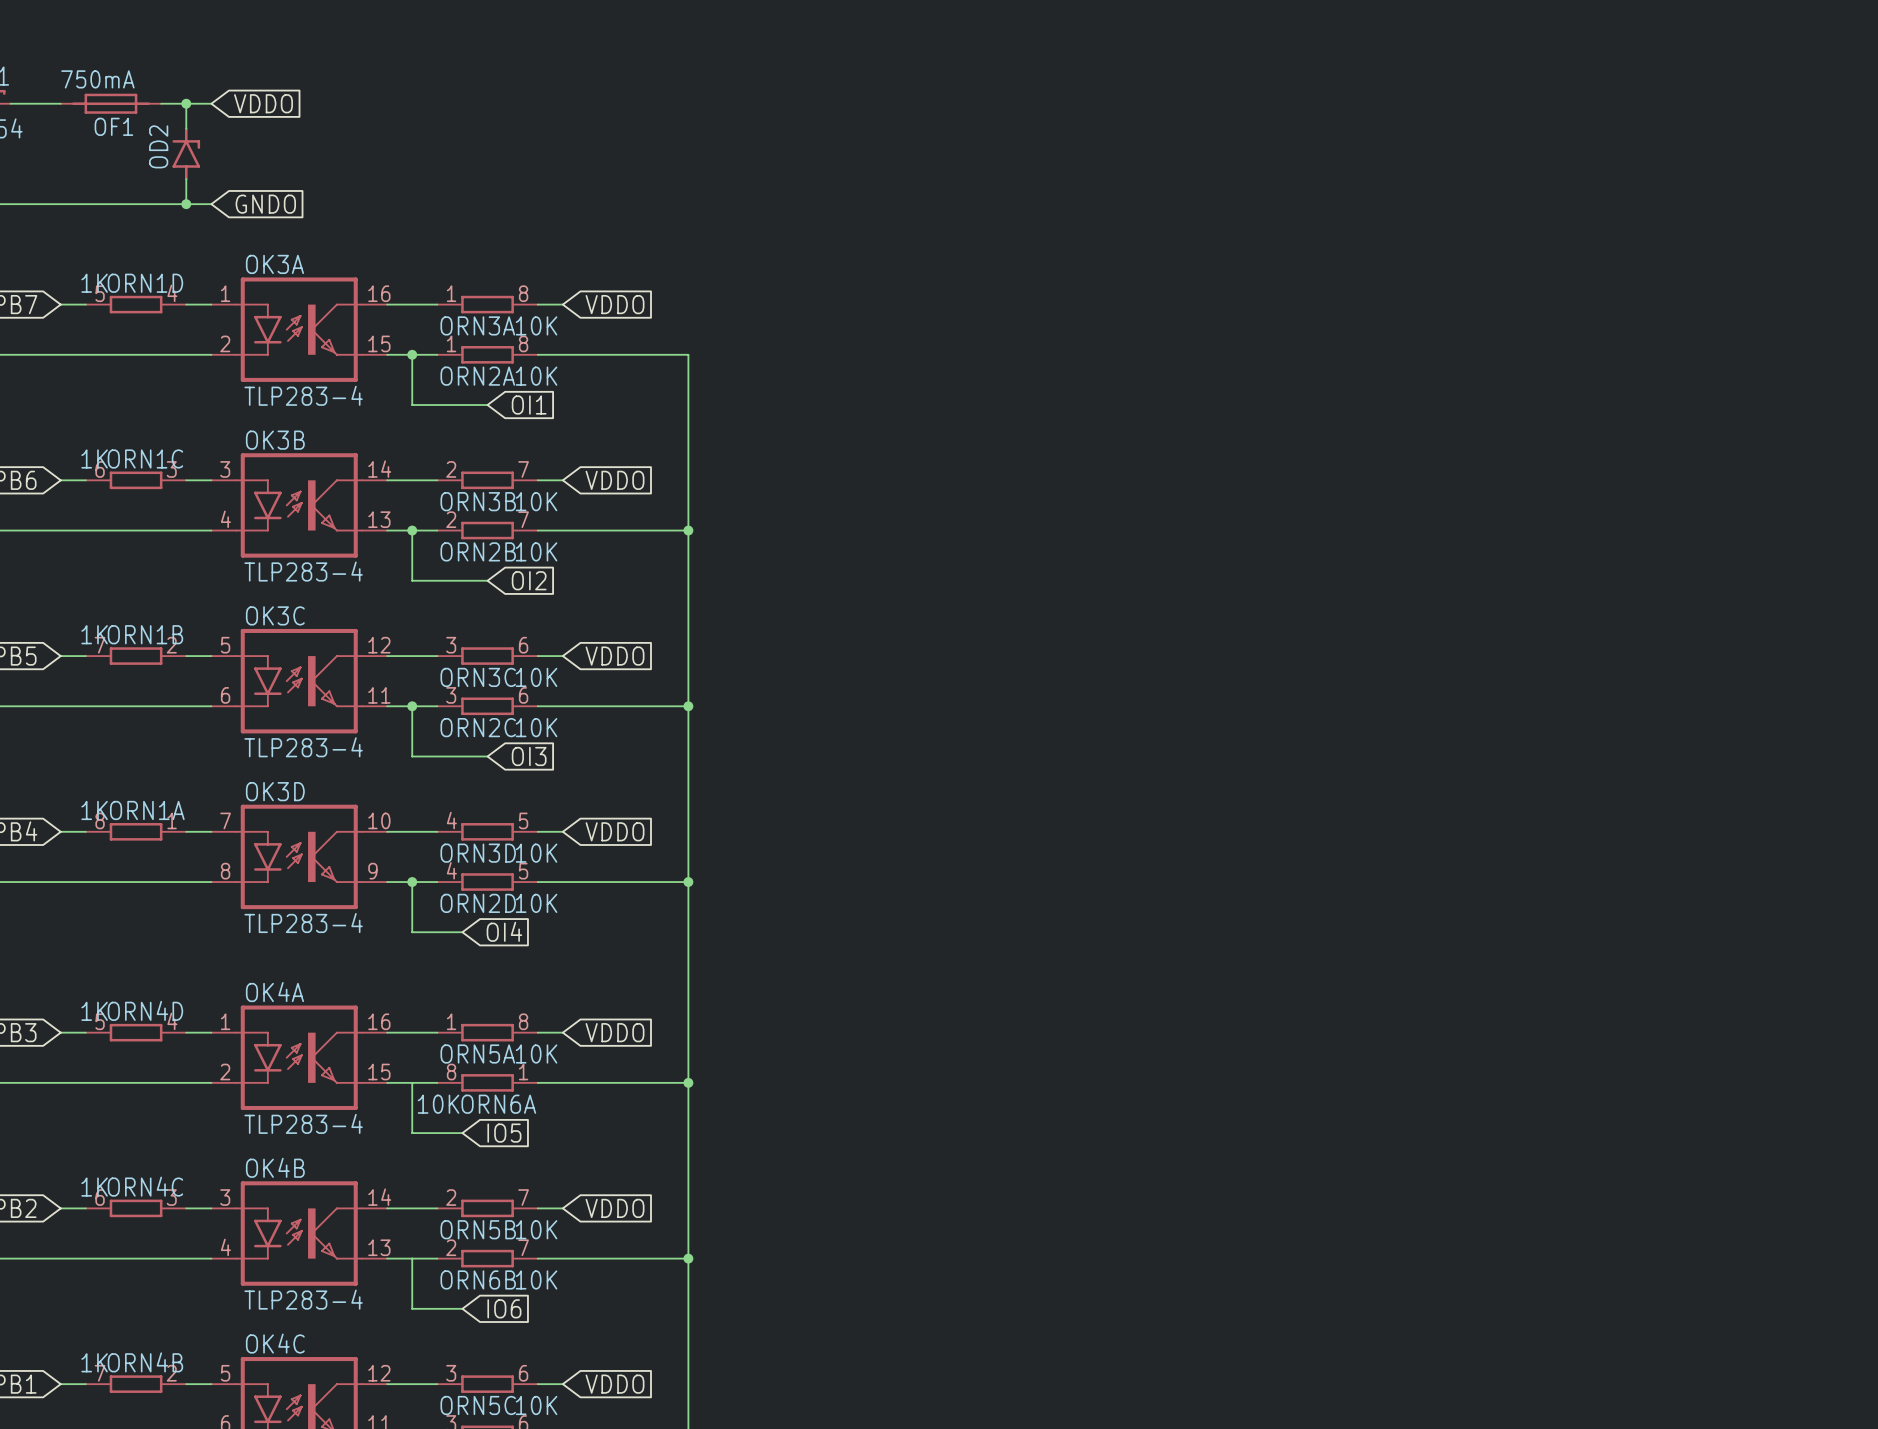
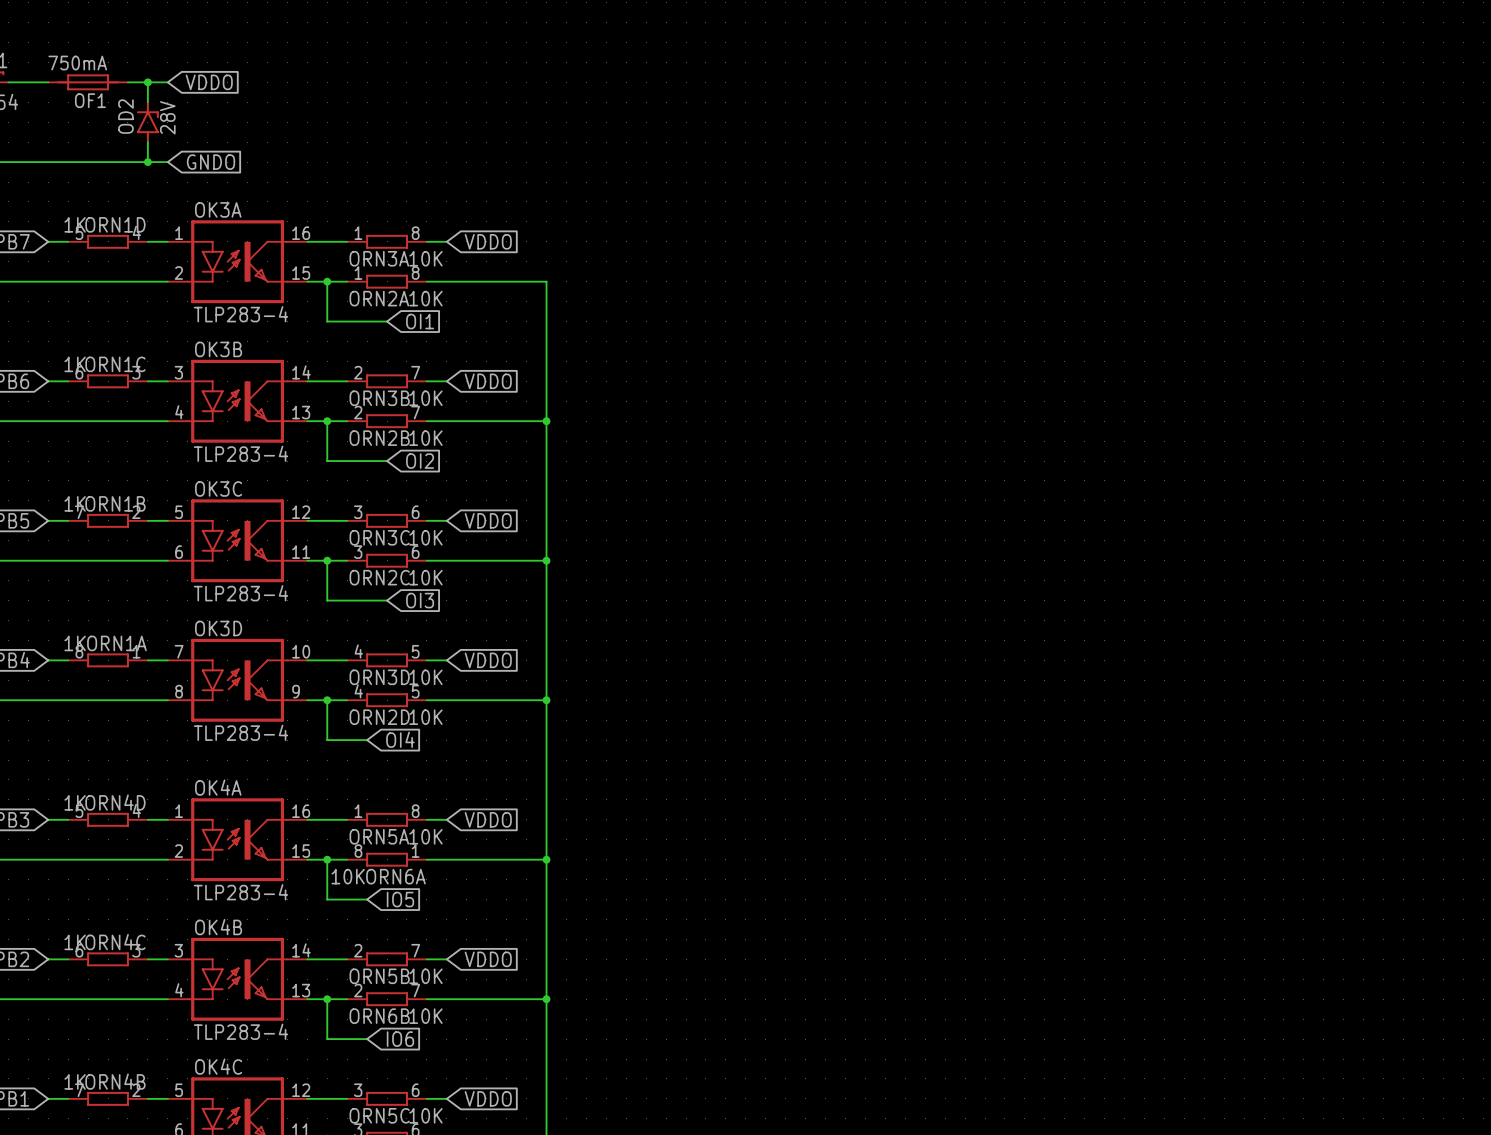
OD2 value: none -> 28V (167, 117)
junction: none -> (327, 859)
junction: none -> (327, 999)

